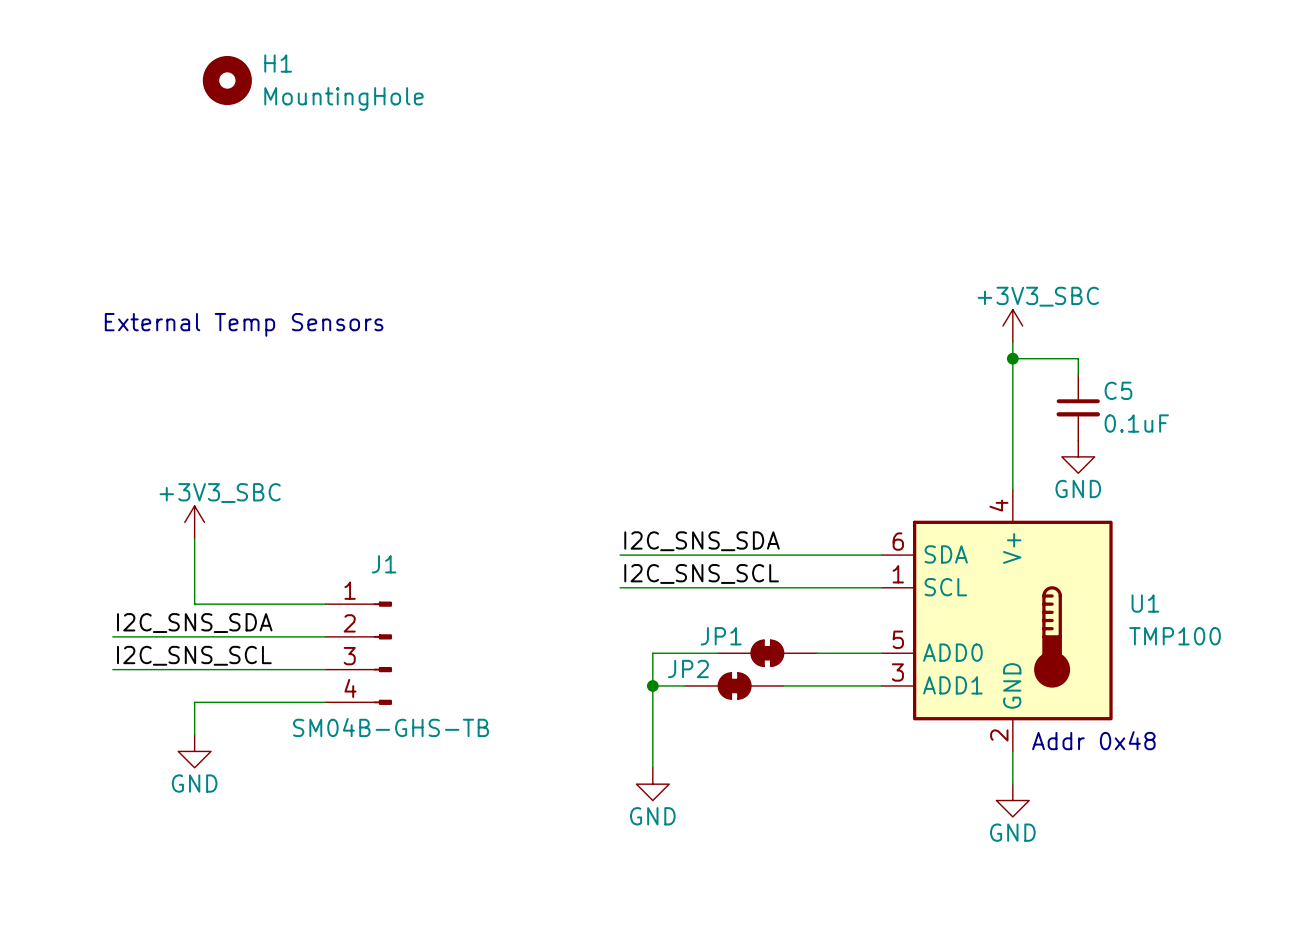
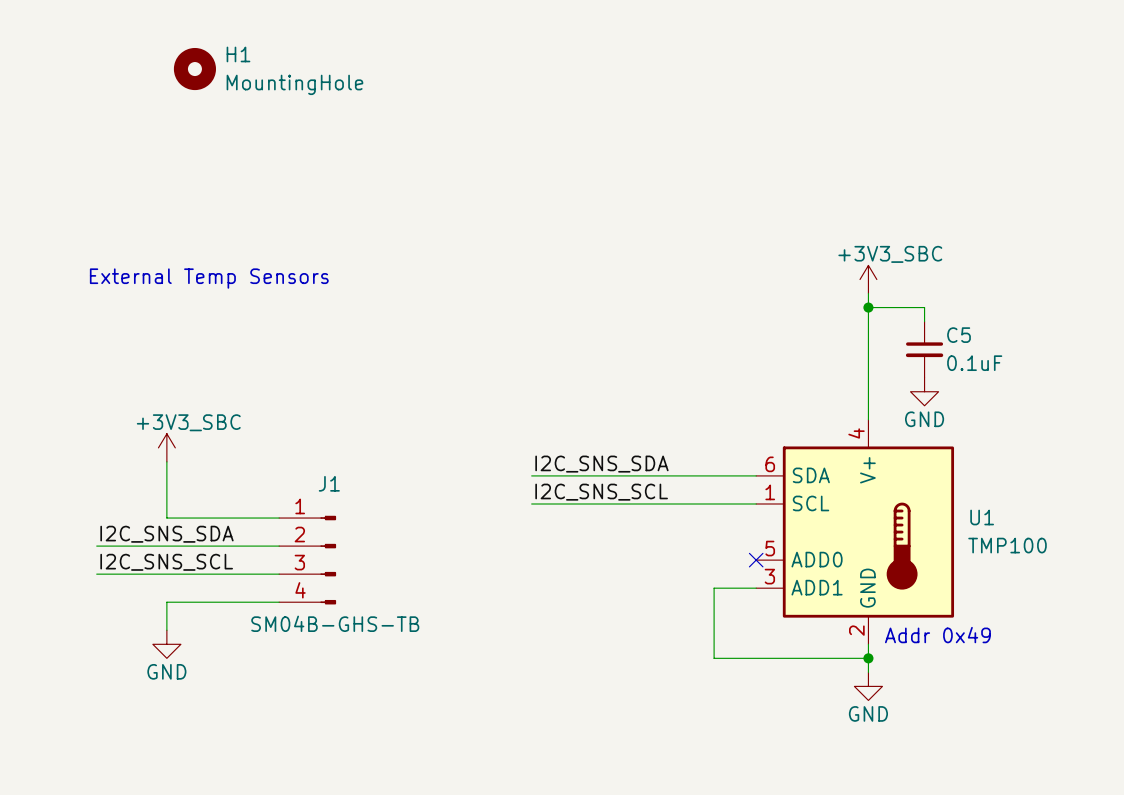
wire: (718, 653) (652, 653) (652, 767) -> none
JP1: (767, 653) -> none
wire: (816, 653) (881, 653) -> none
no-connect mark: none -> (756, 560)
wire: (652, 685) (685, 685) -> none
junction: (652, 685) -> none
JP2: (734, 685) -> none
wire: (783, 685) (832, 685) -> (868, 658) (714, 658) (714, 588)
text: Addr 0x48 (1093, 740) -> Addr 0x49 (937, 635)
junction: none -> (868, 658)
power symbol: GND (652, 784) -> none

